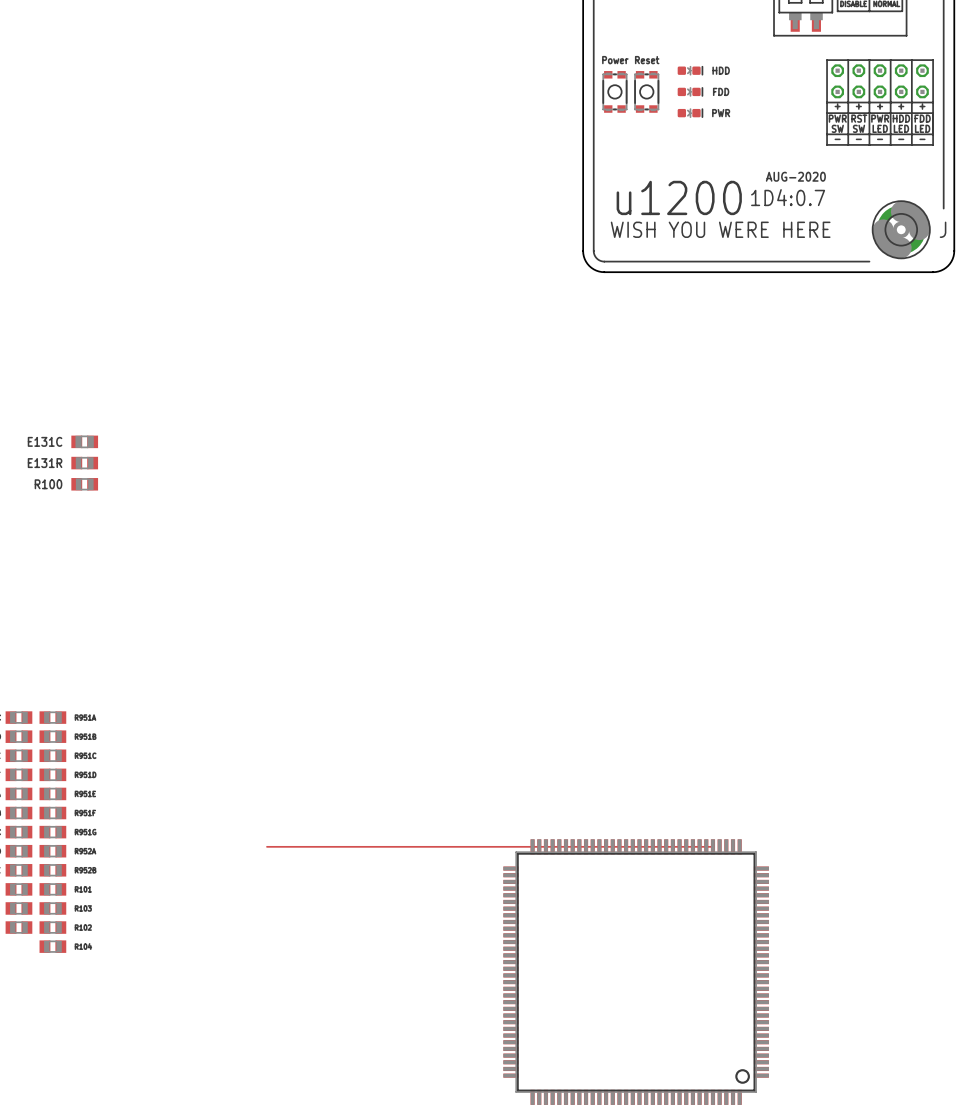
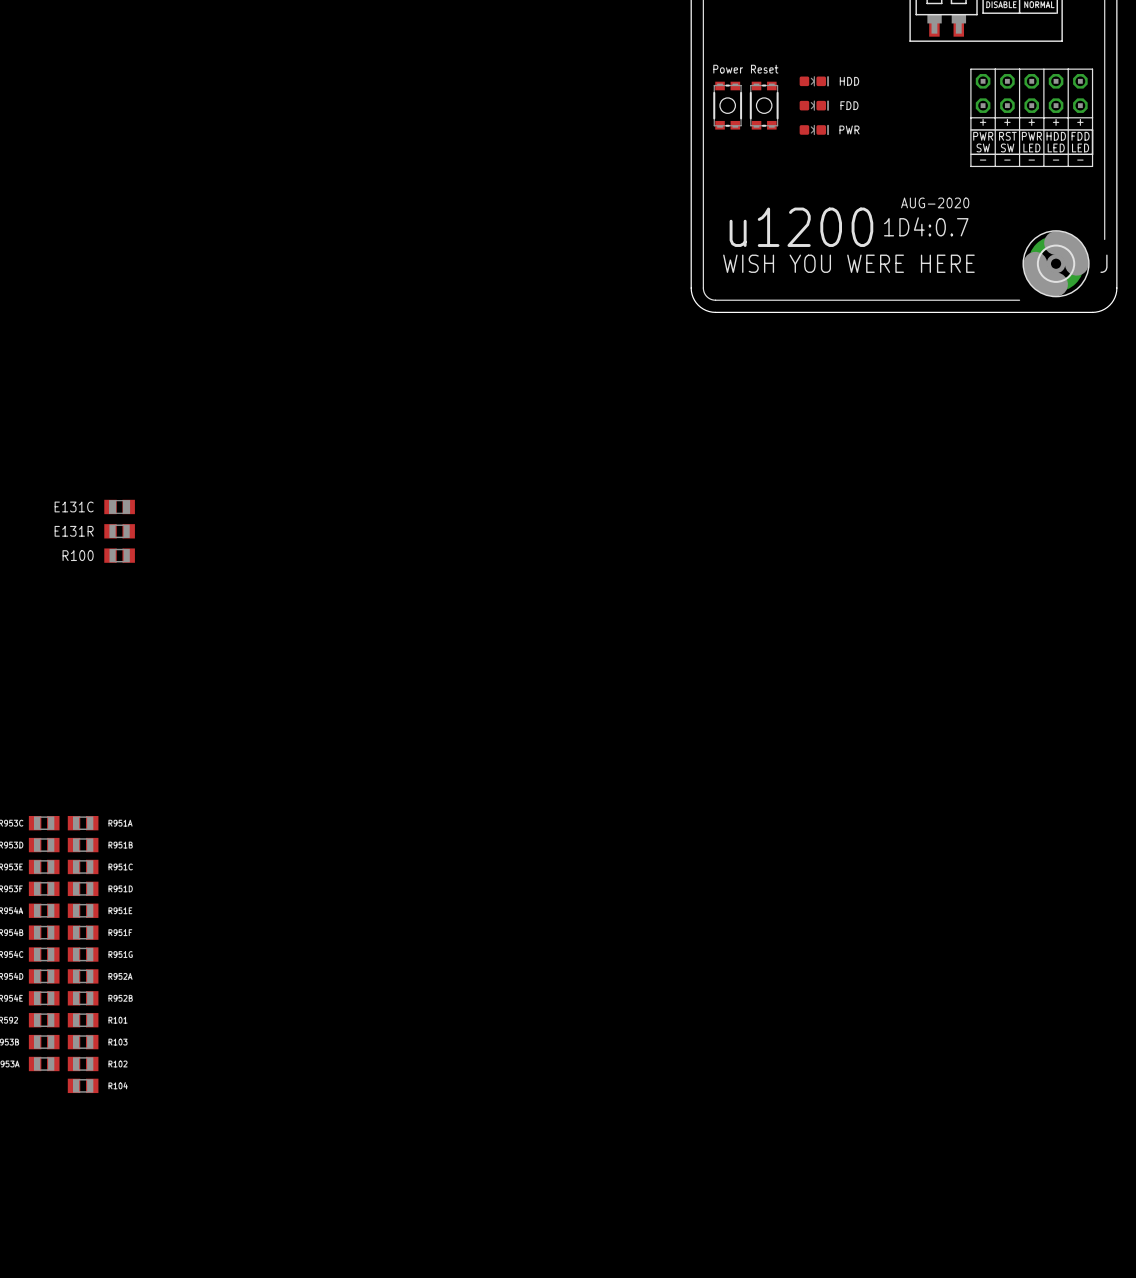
track: (266, 846) (712, 846) -> none
part: (636, 972) -> none

